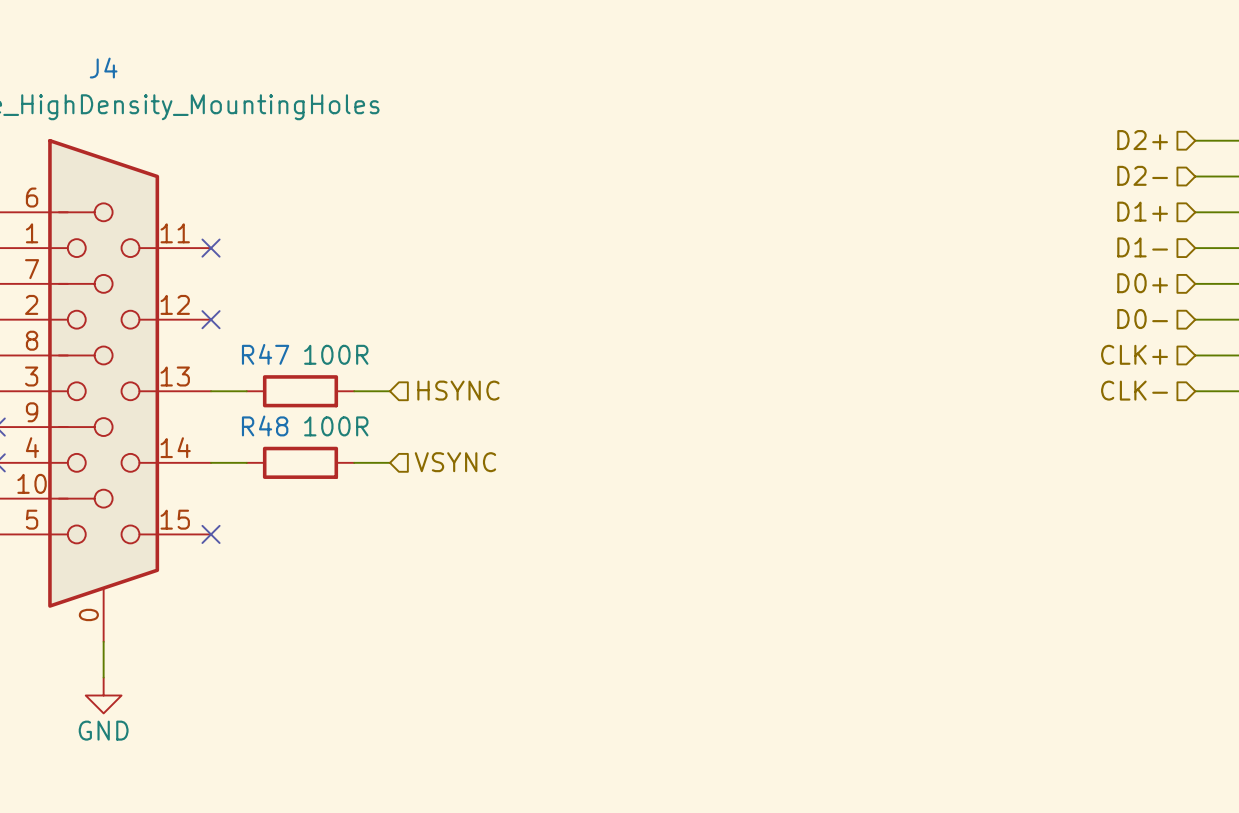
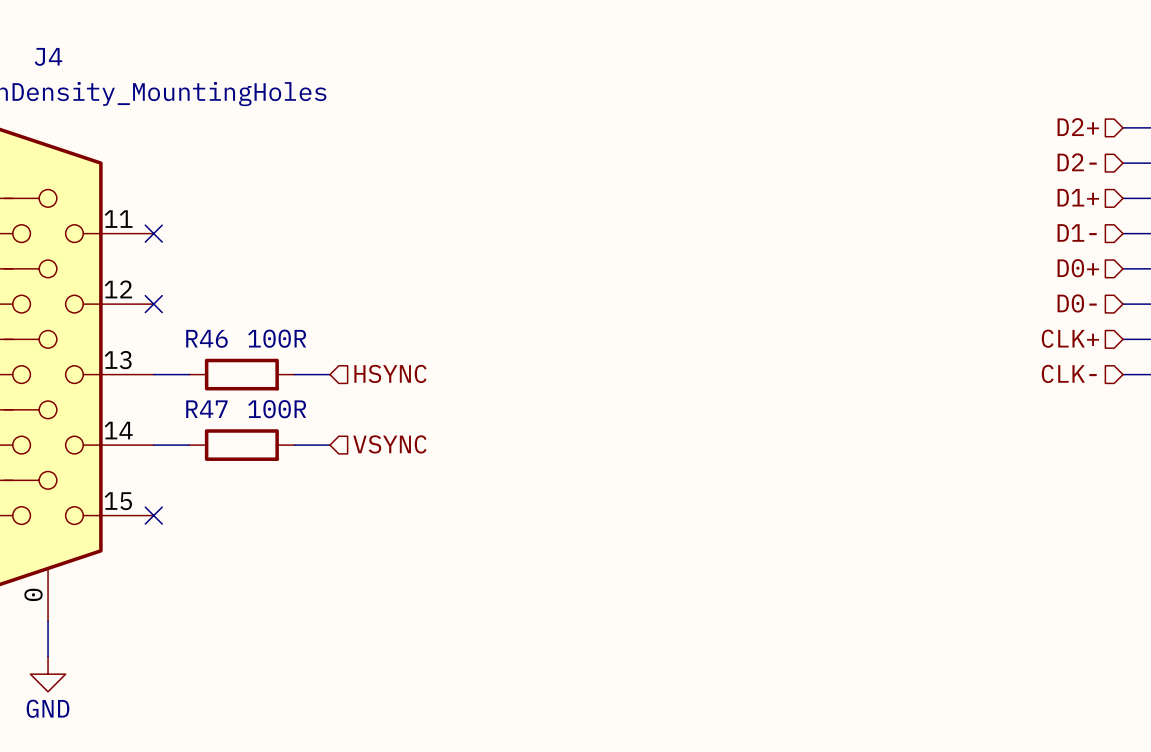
R47 name: R47 (265, 354) -> R46 (206, 338)
R48 name: R48 (265, 425) -> R47 (206, 409)

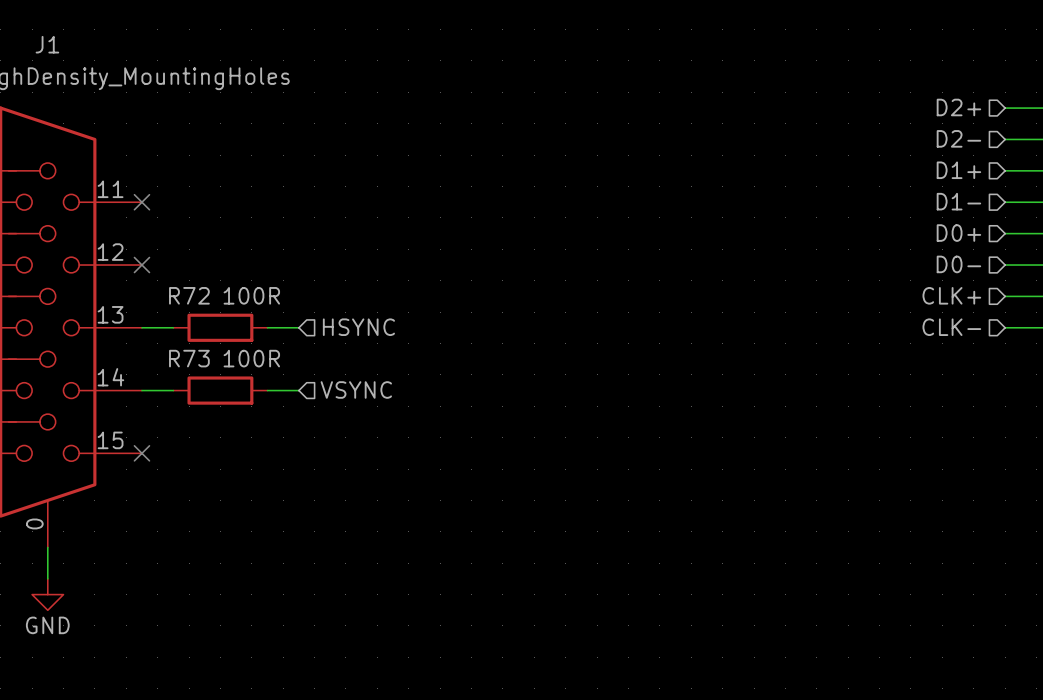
J4 name: J4 (48, 56) -> J1 (47, 44)
R46 name: R46 (206, 338) -> R72 (189, 295)
R47 name: R47 (206, 409) -> R73 (189, 358)

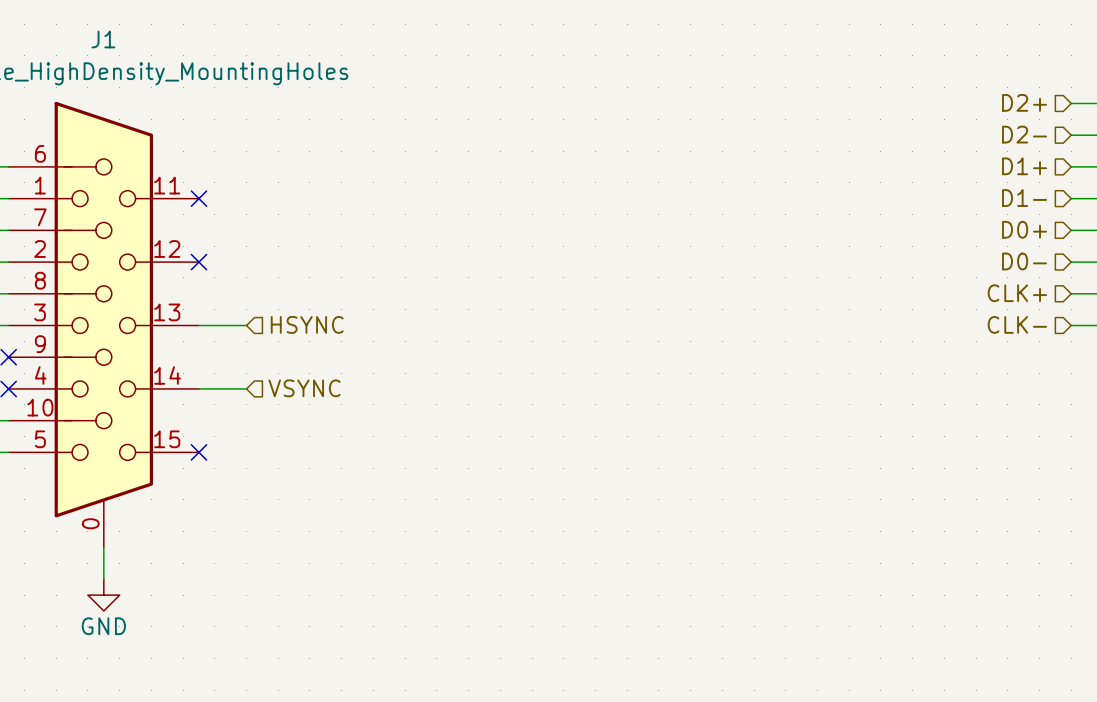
R72: 100R (220, 327) -> none
wire: (267, 327) (298, 327) -> none
hierarchical label position: HSYNC (358, 327) -> HSYNC (307, 324)
hierarchical label position: VSYNC (356, 389) -> VSYNC (304, 388)
R73: 100R (220, 390) -> none
wire: (267, 390) (298, 390) -> none

